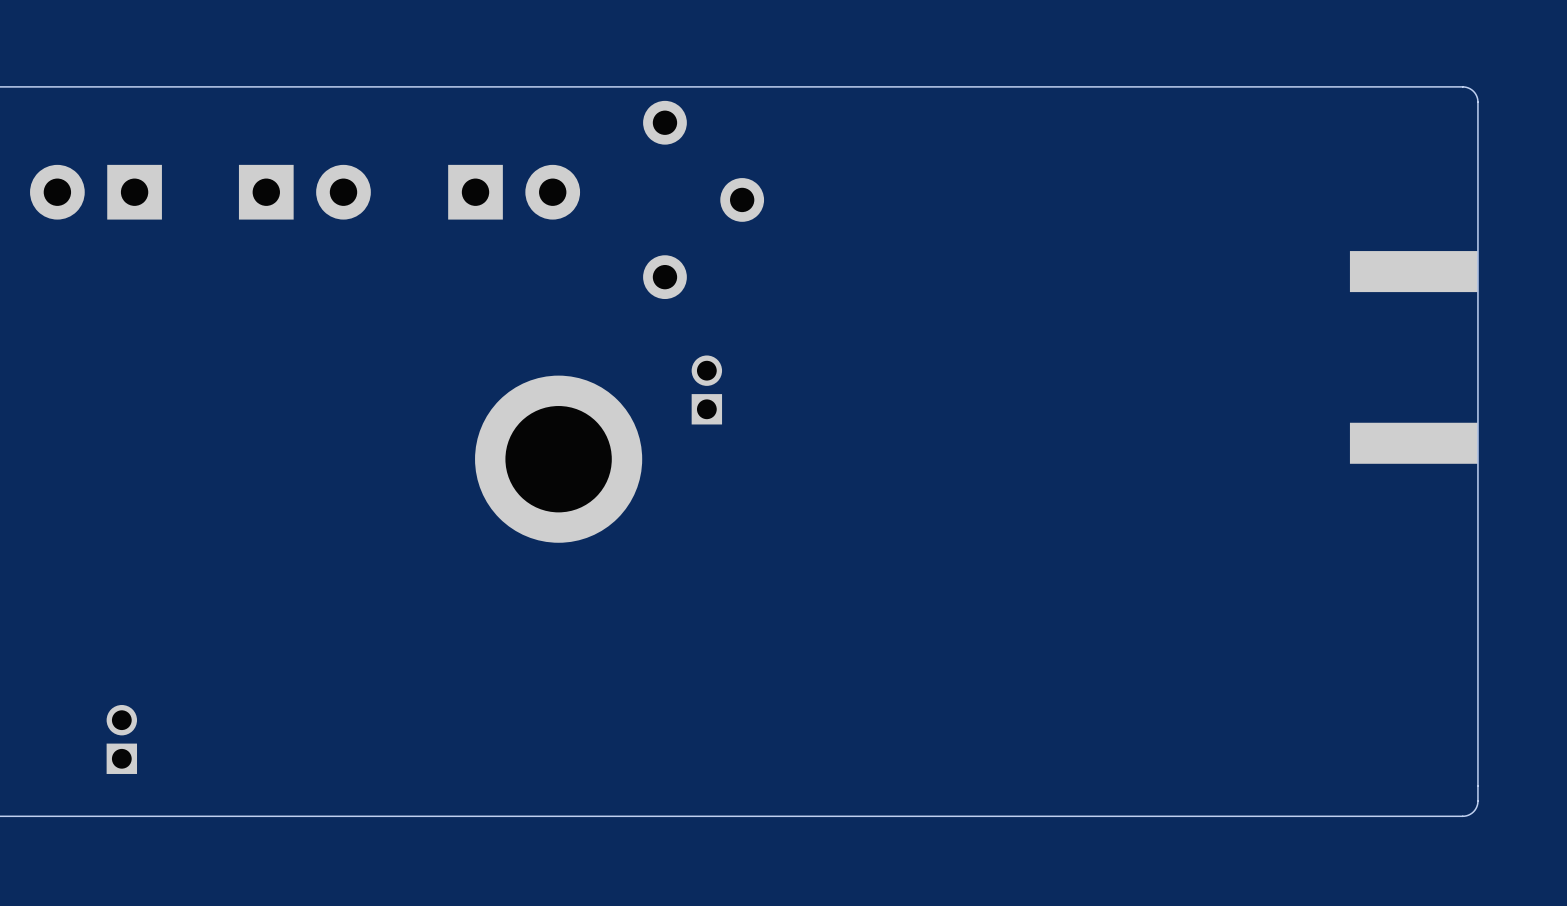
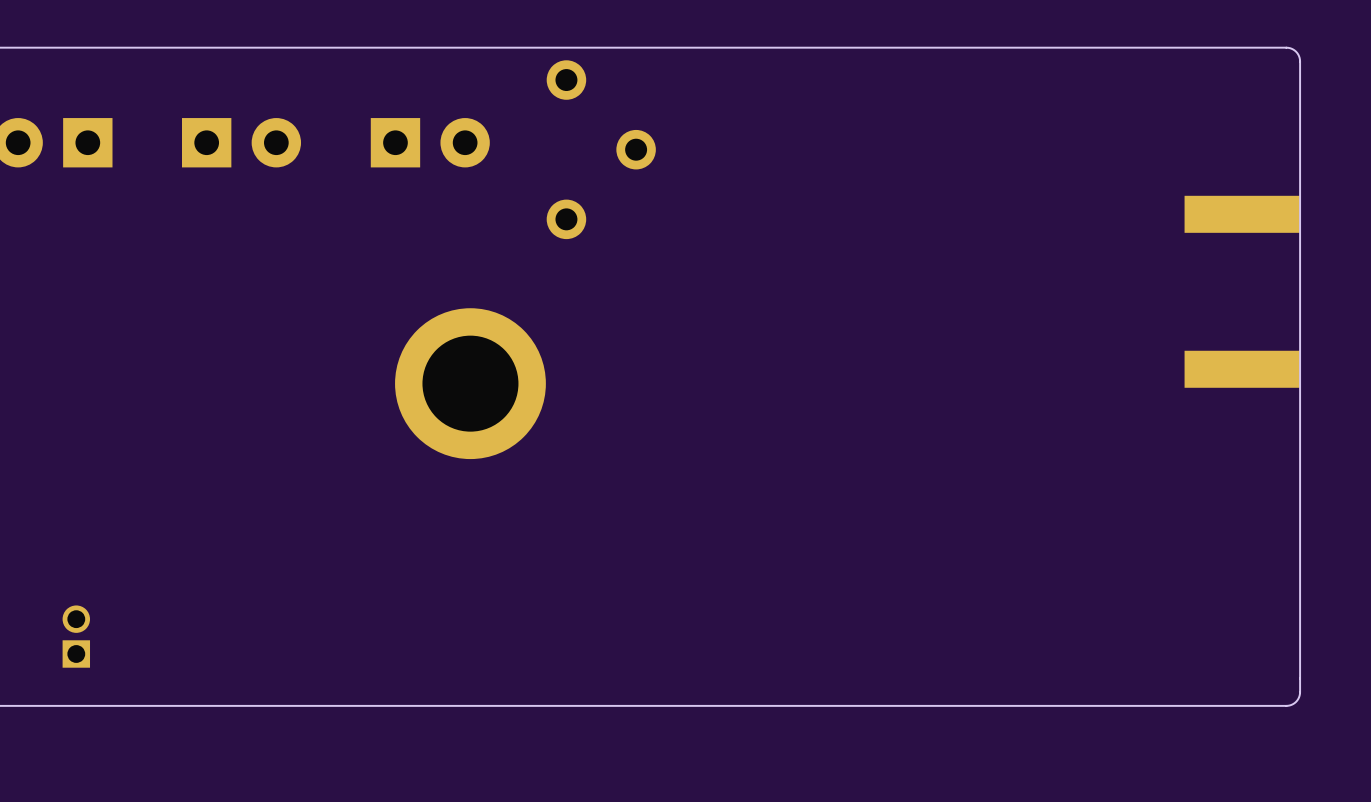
part: (706, 389) -> none

